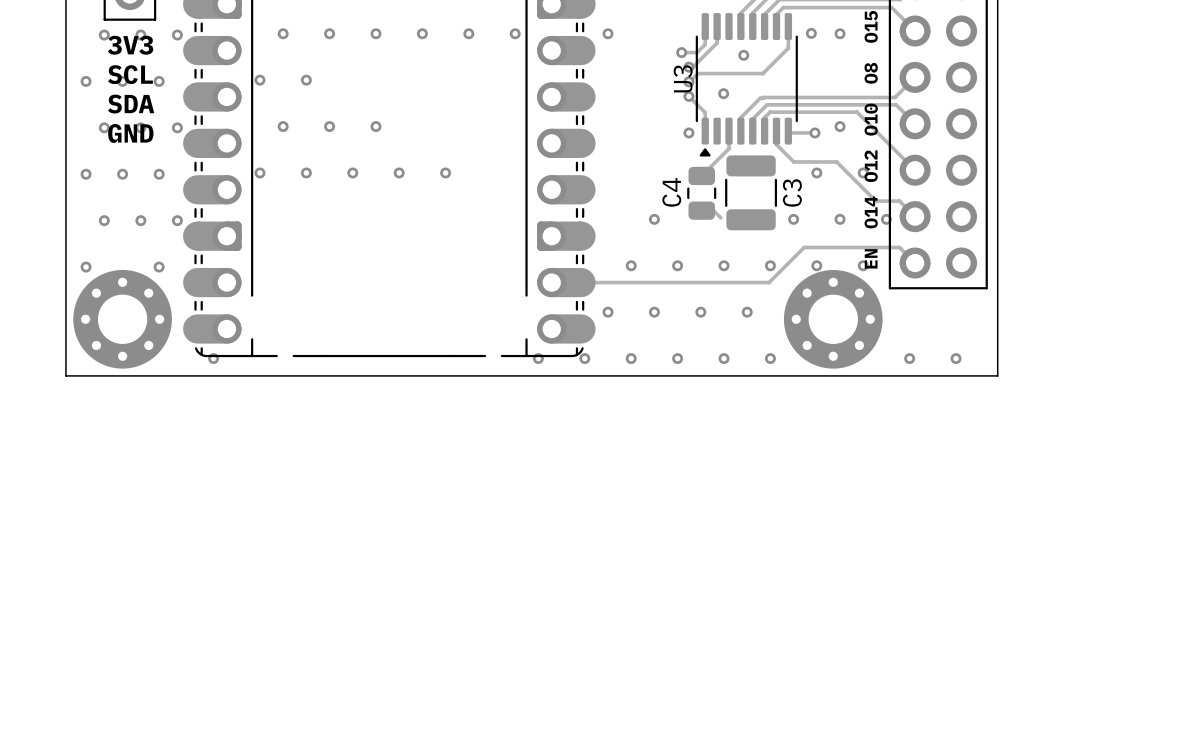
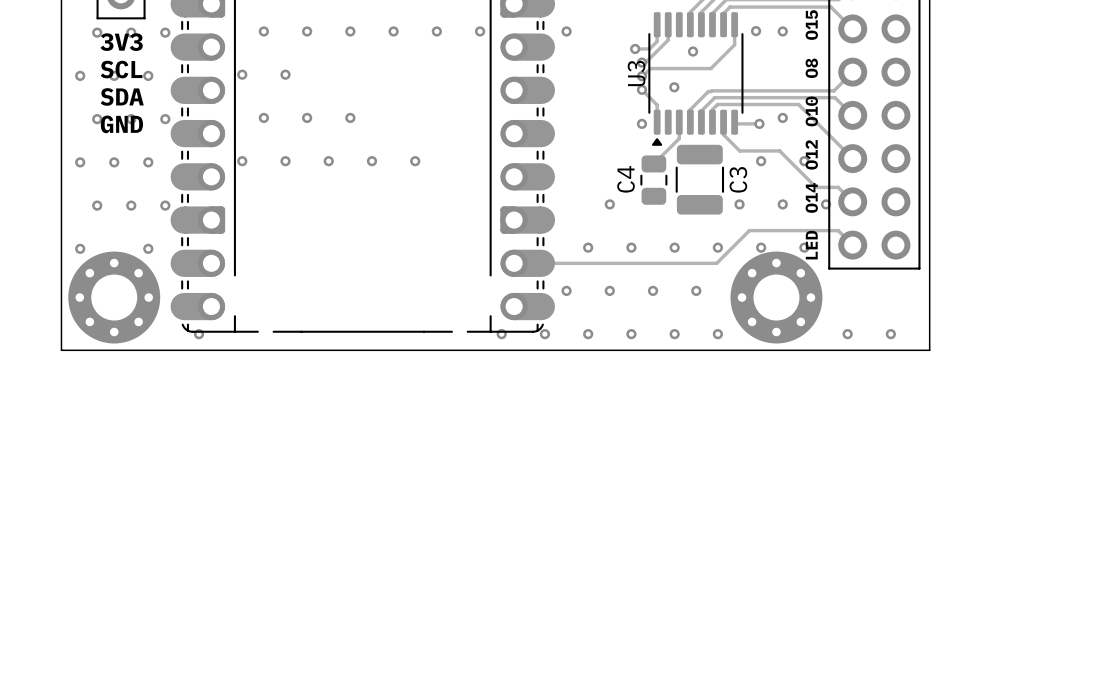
track: (701, 210) (713, 210) (720, 217) -> none
text: EN (871, 258) -> LED (811, 245)

